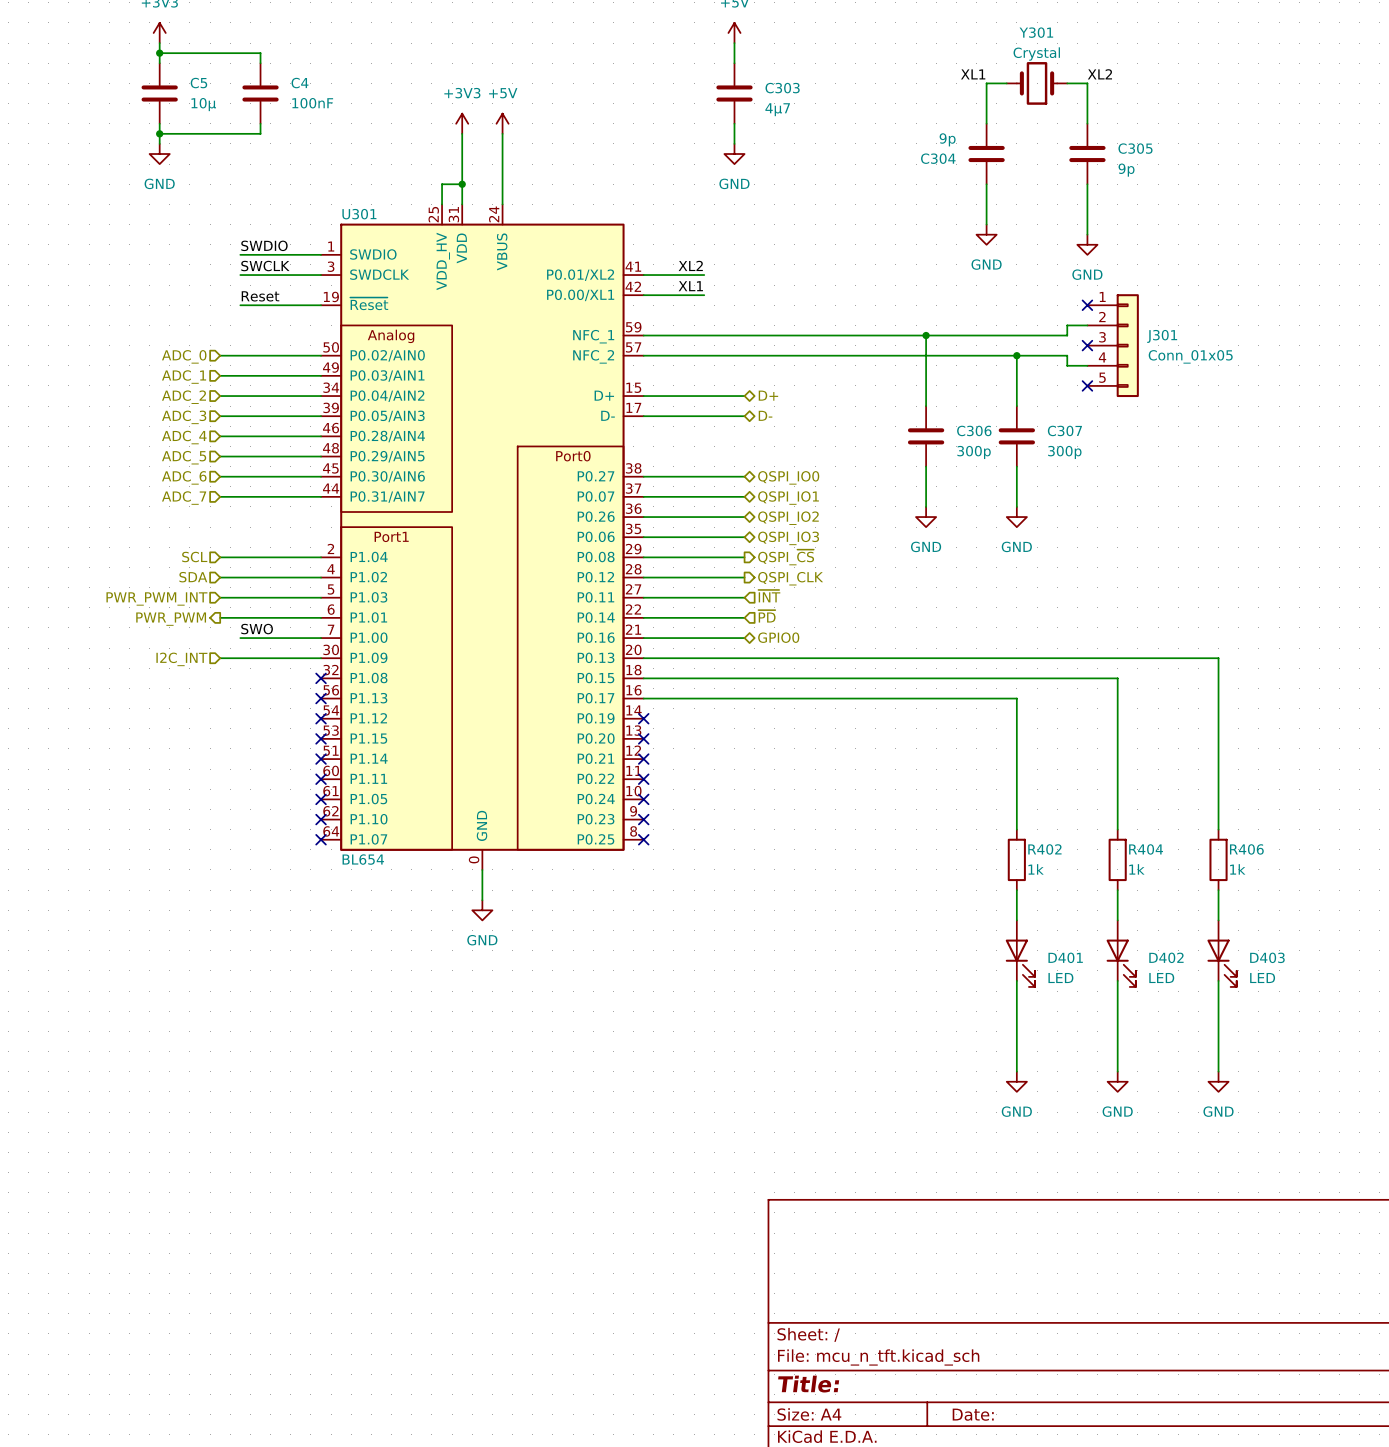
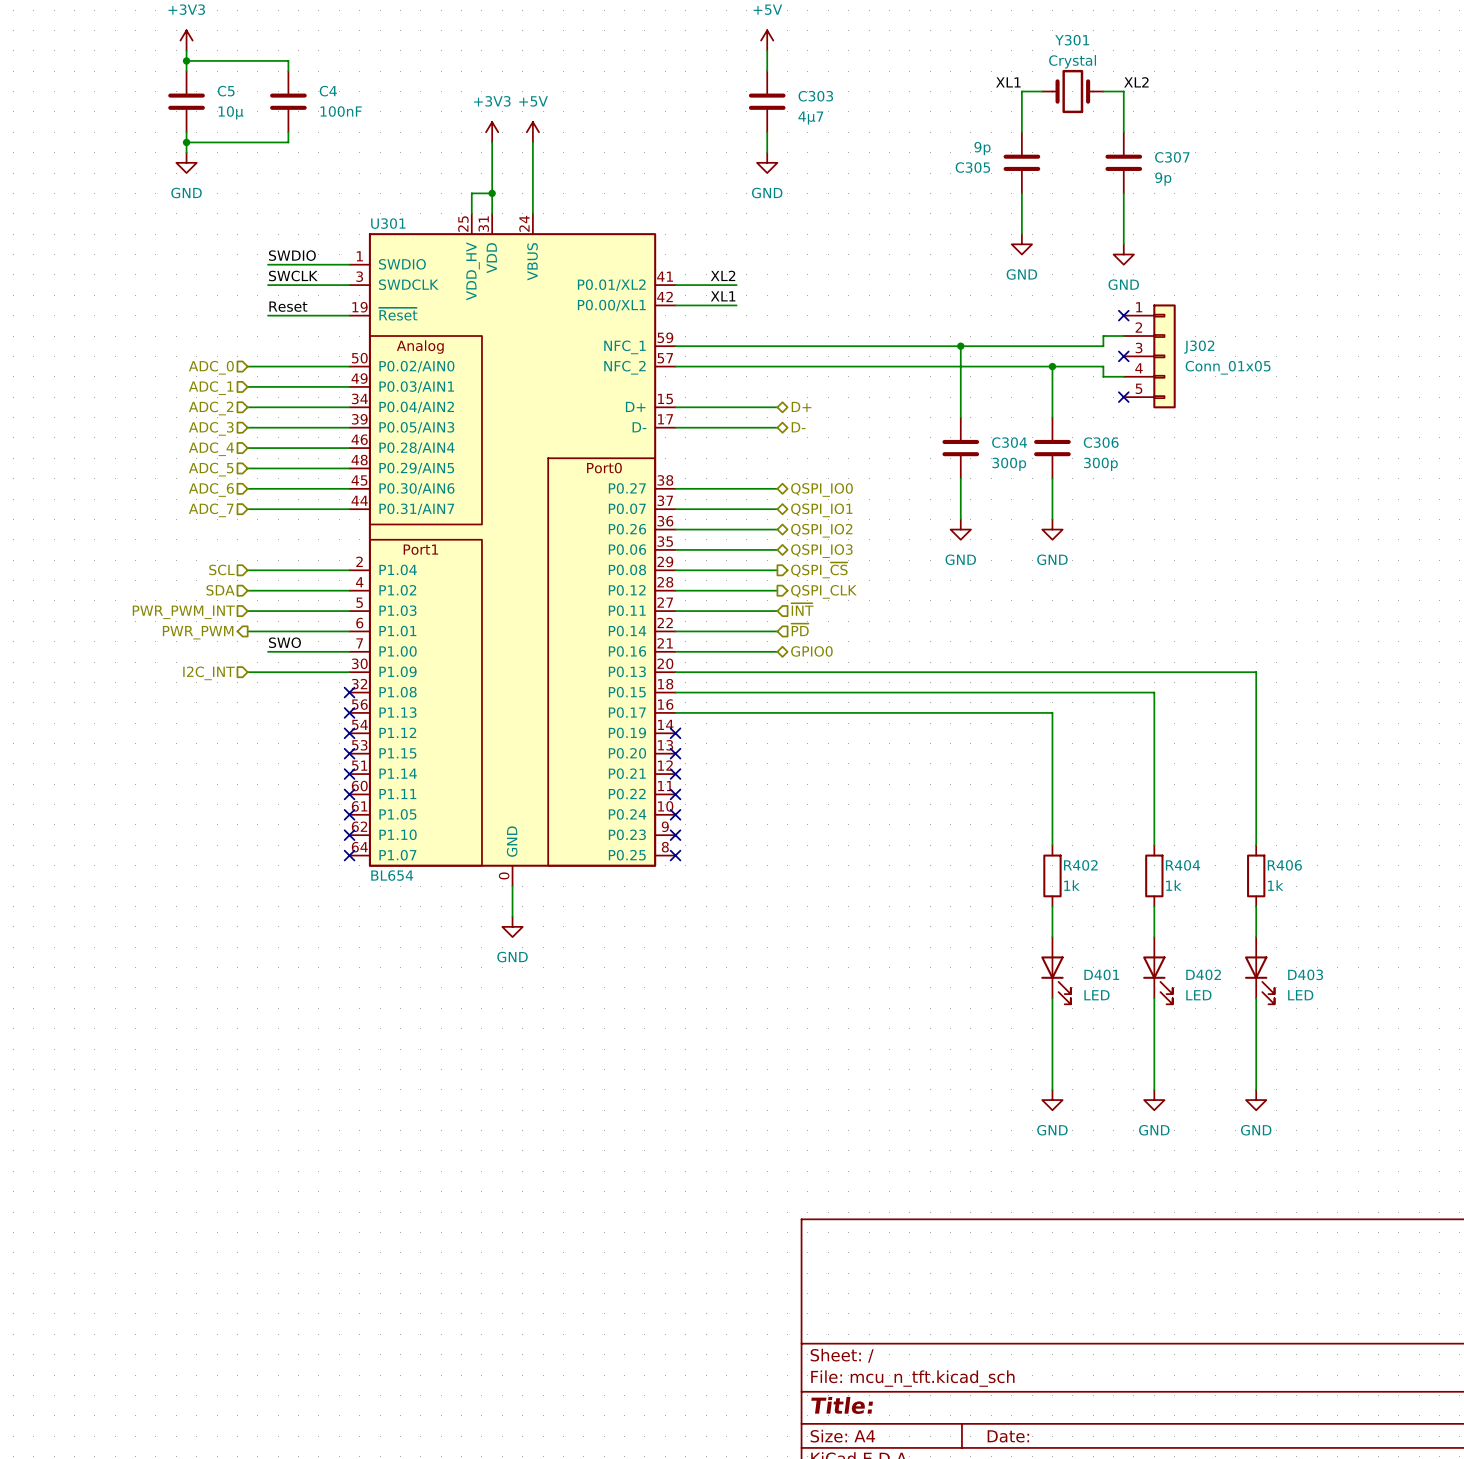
C305 name: C305 (1135, 148) -> C307 (1172, 157)
C304 name: C304 (938, 158) -> C305 (972, 167)
J301 name: J301 (1162, 336) -> J302 (1199, 347)
C306 name: C306 (974, 430) -> C304 (1009, 442)
C307 name: C307 (1064, 430) -> C306 (1101, 442)

